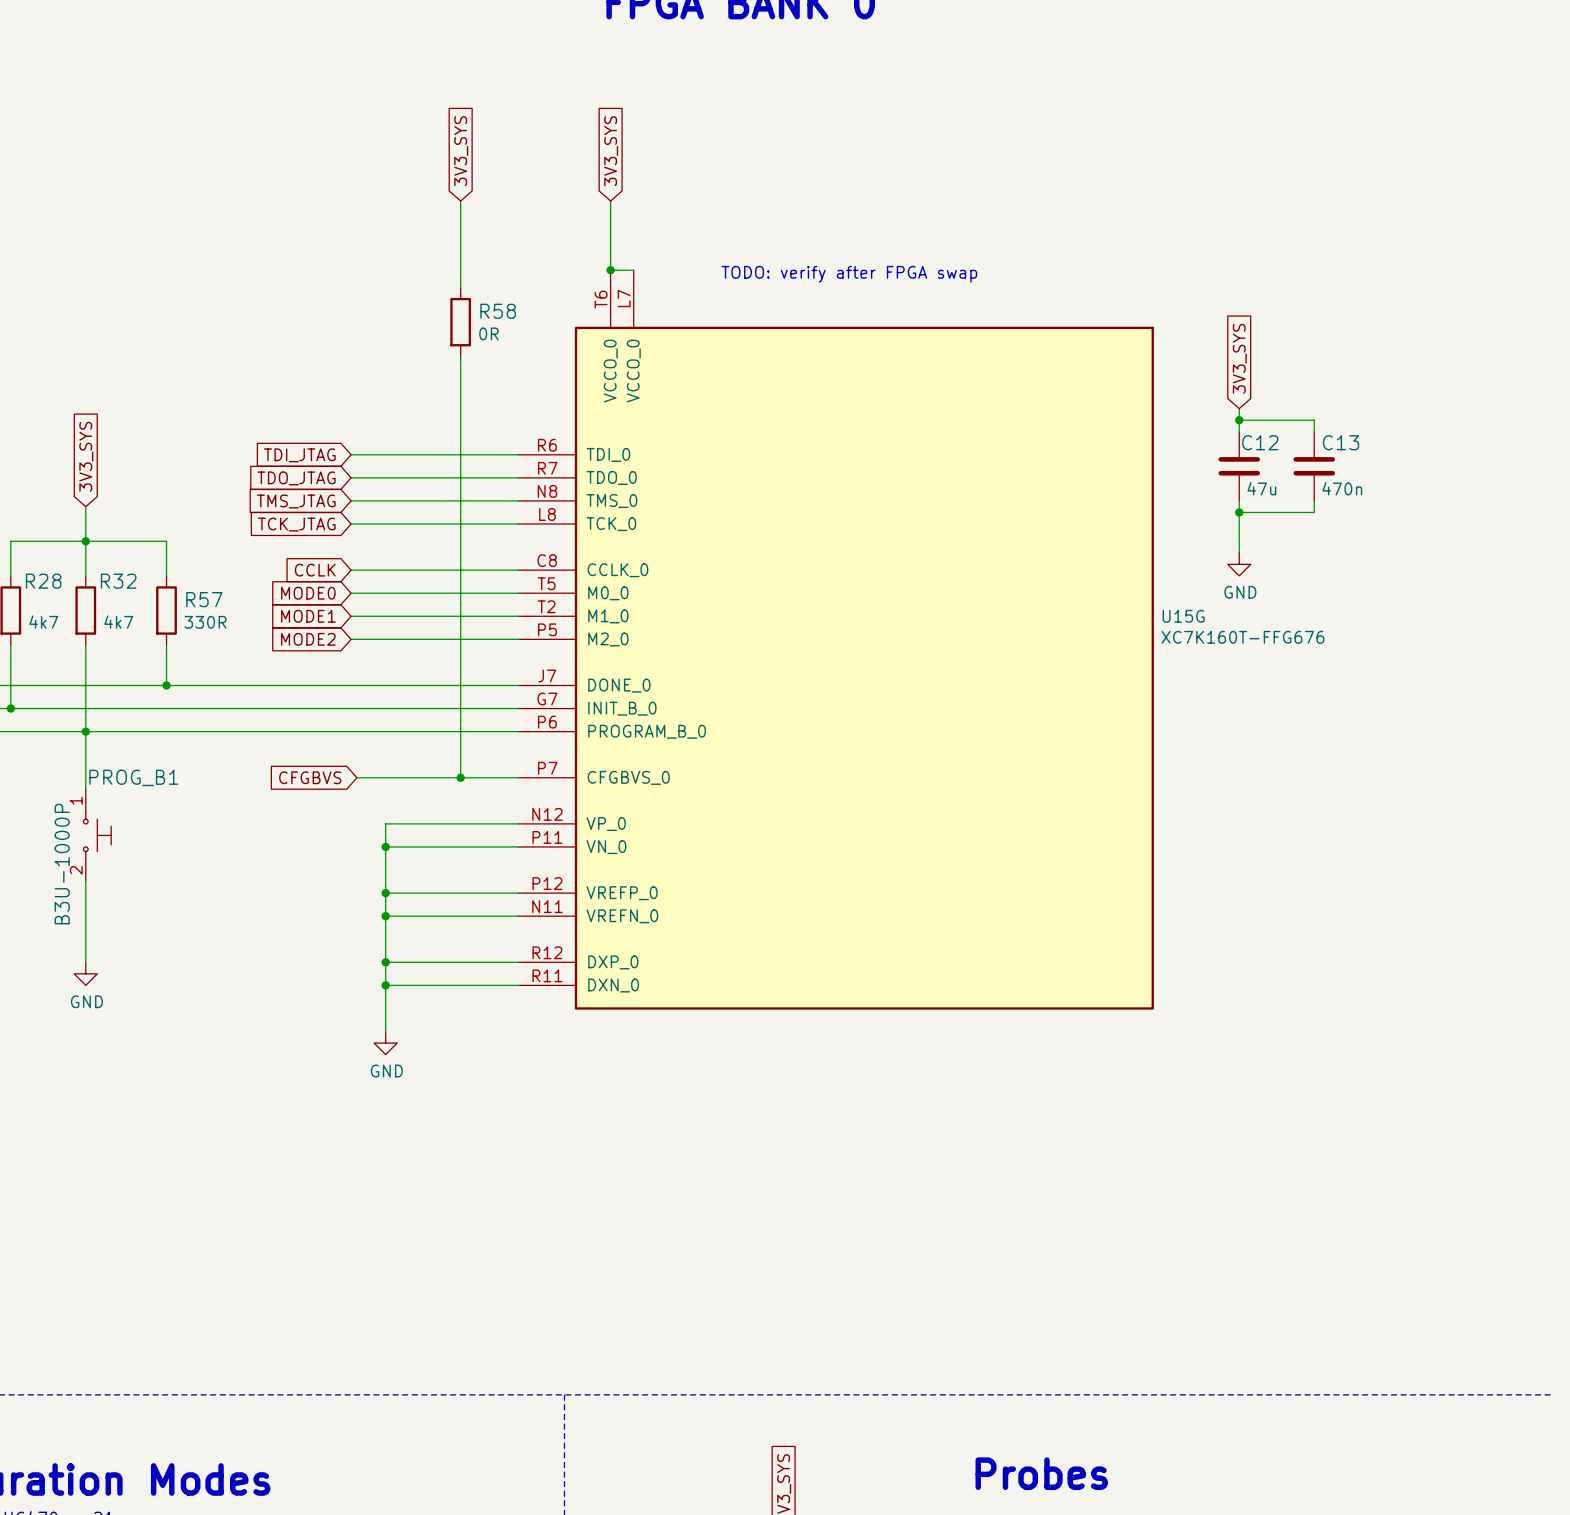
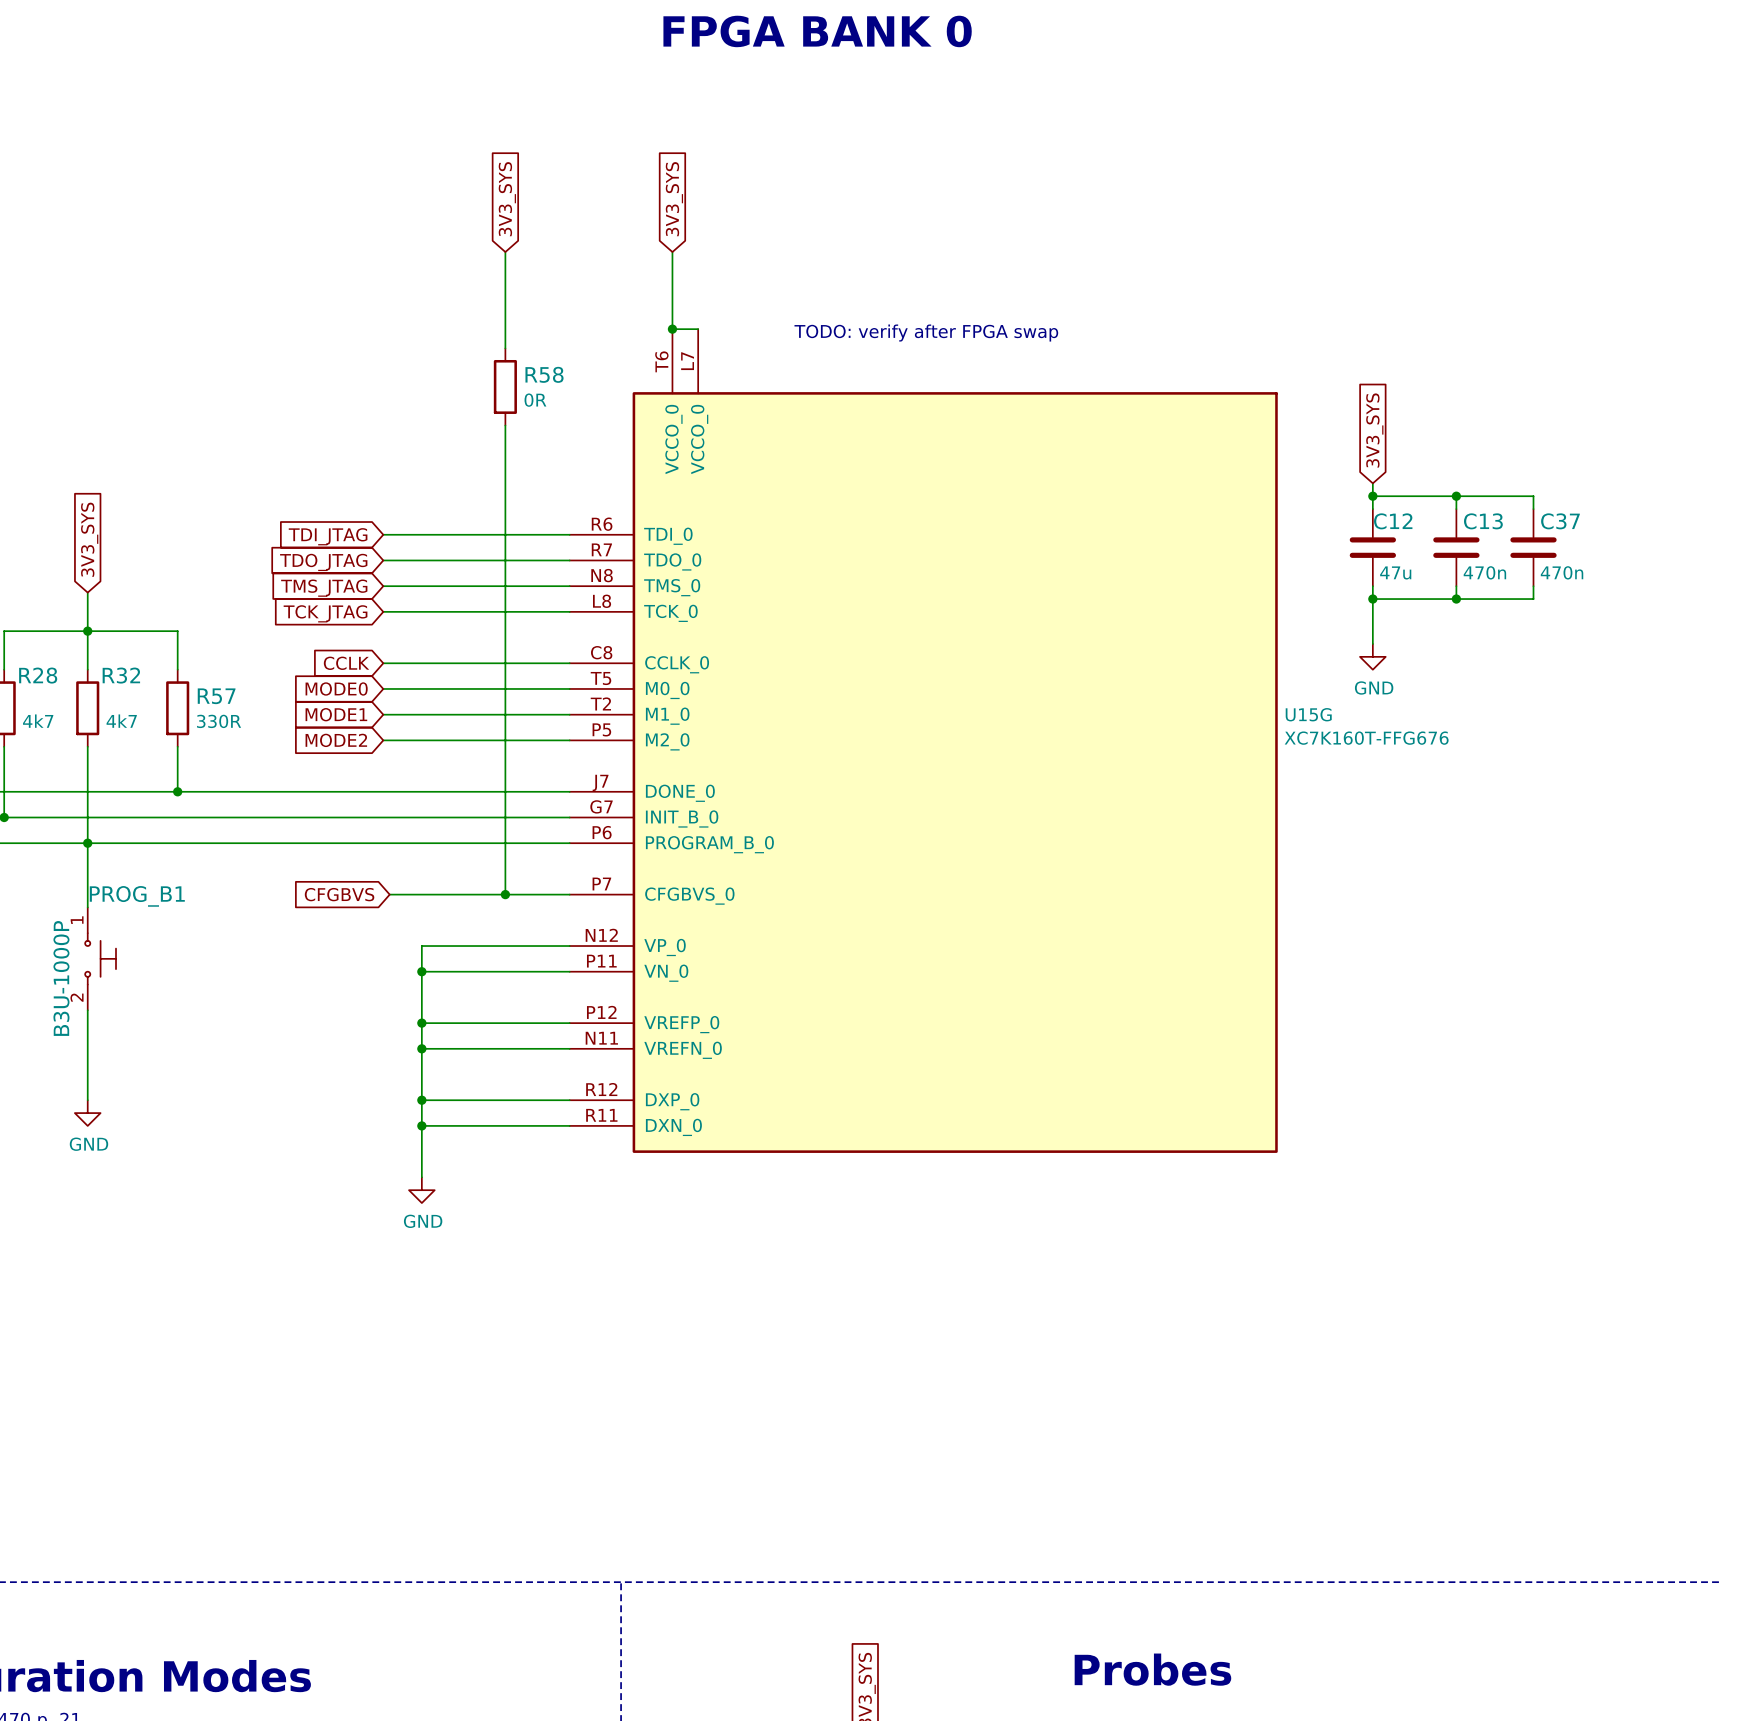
wire: none -> (1456, 496) (1533, 496) (1533, 509)
junction: none -> (1456, 496)
C37: none -> (1533, 547)
wire: none -> (1533, 586) (1533, 599) (1456, 599)
junction: none -> (1456, 599)

